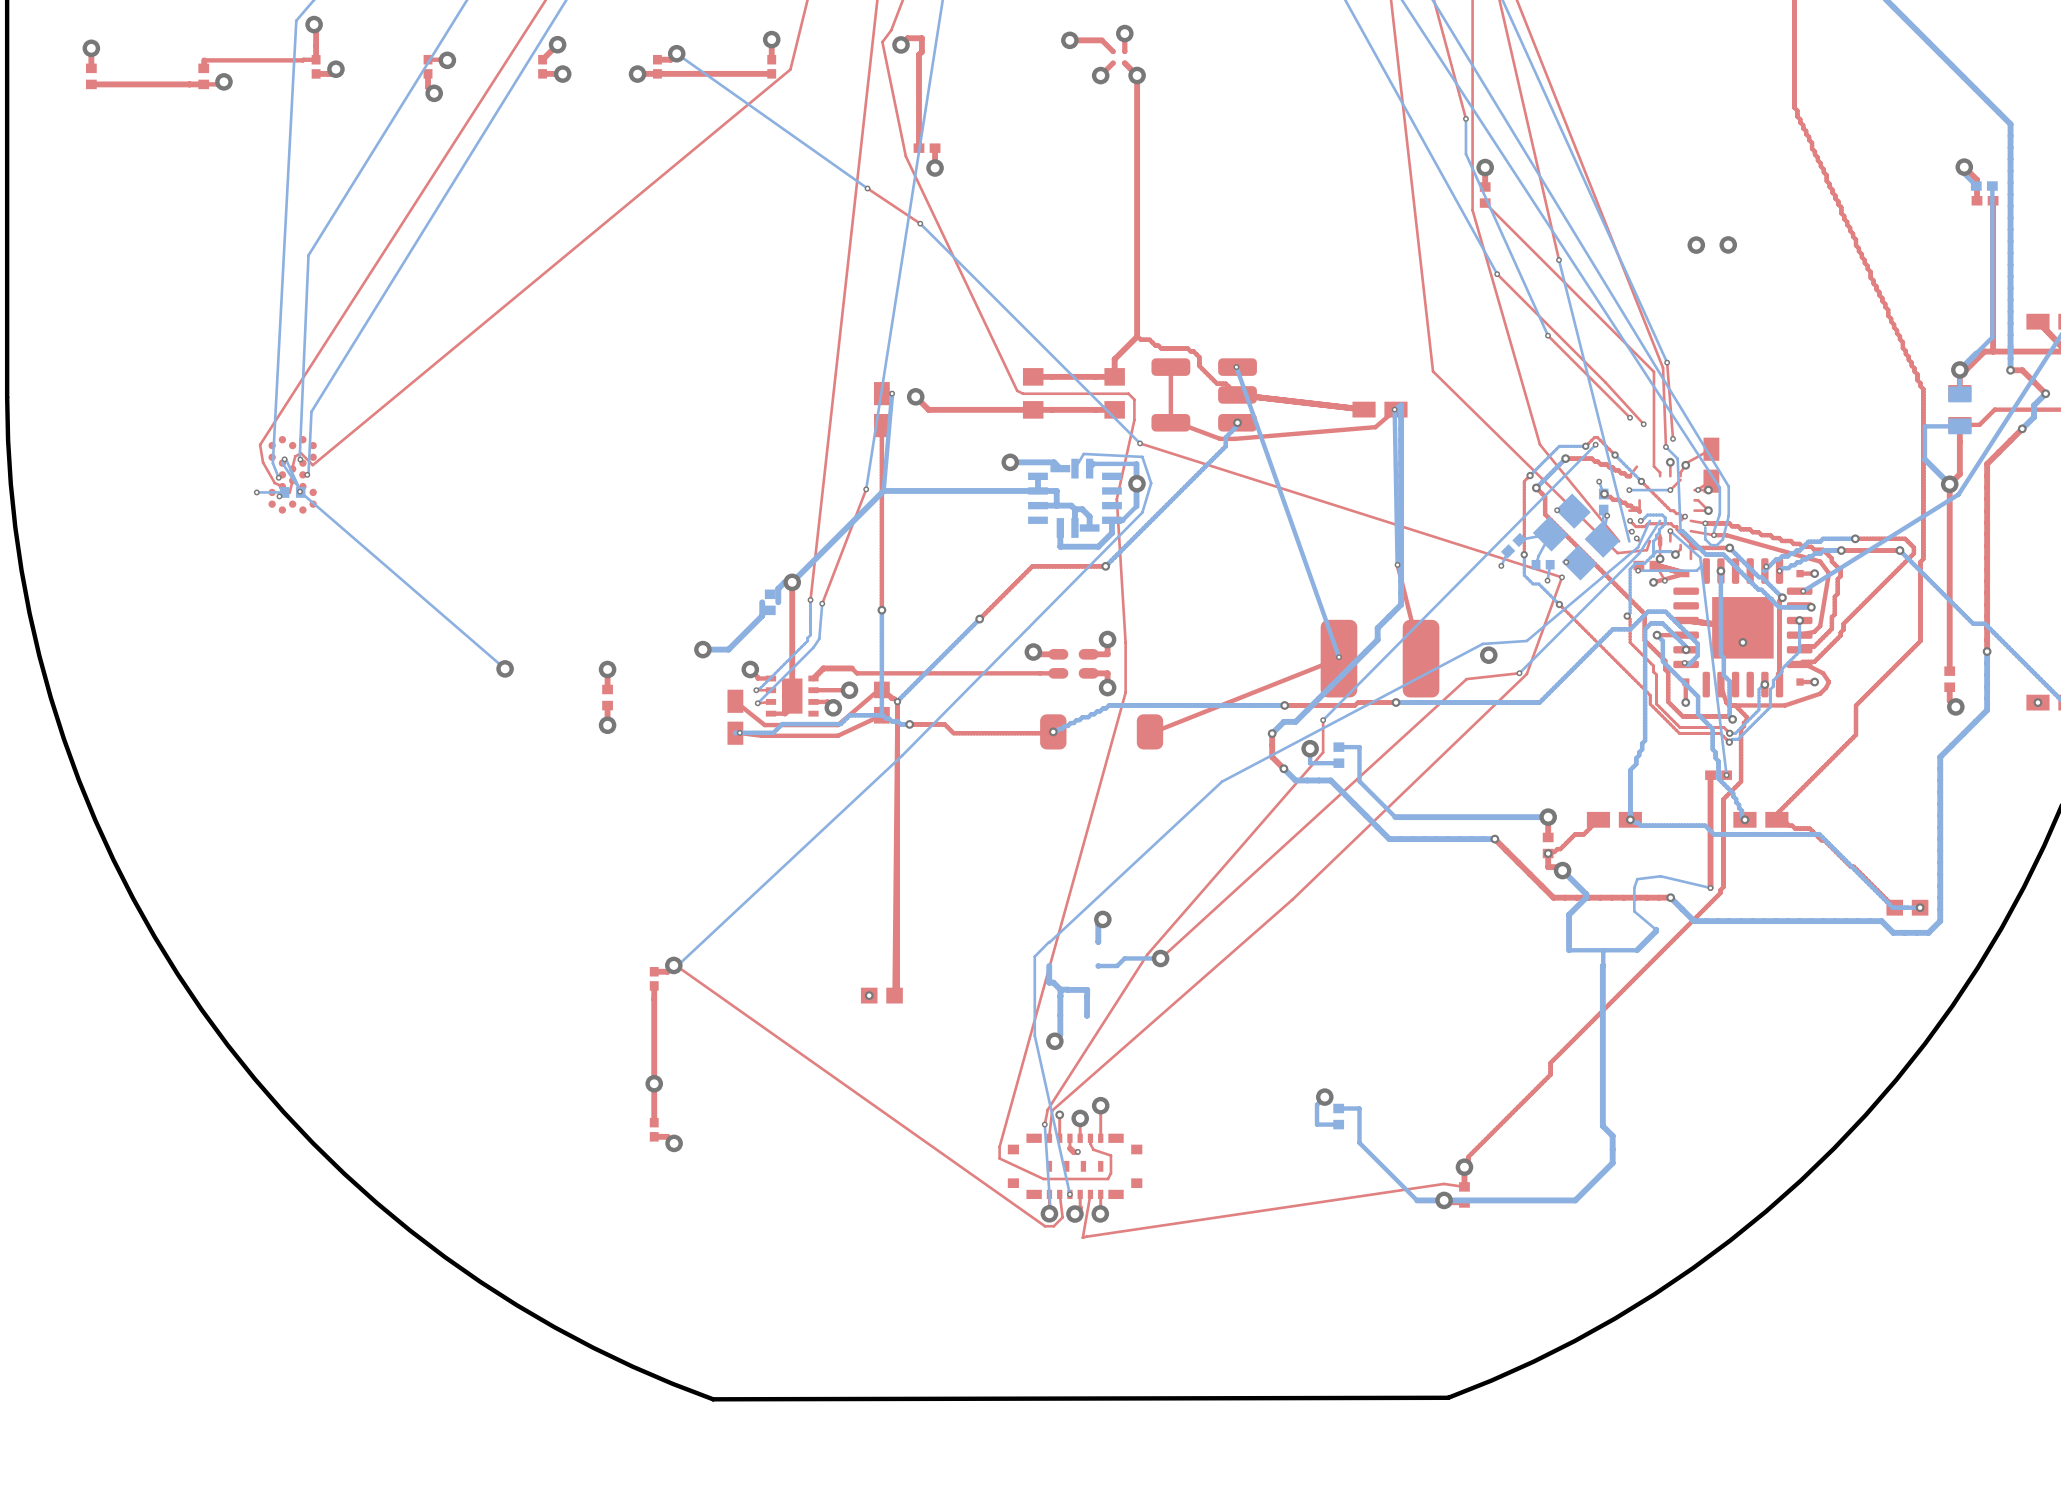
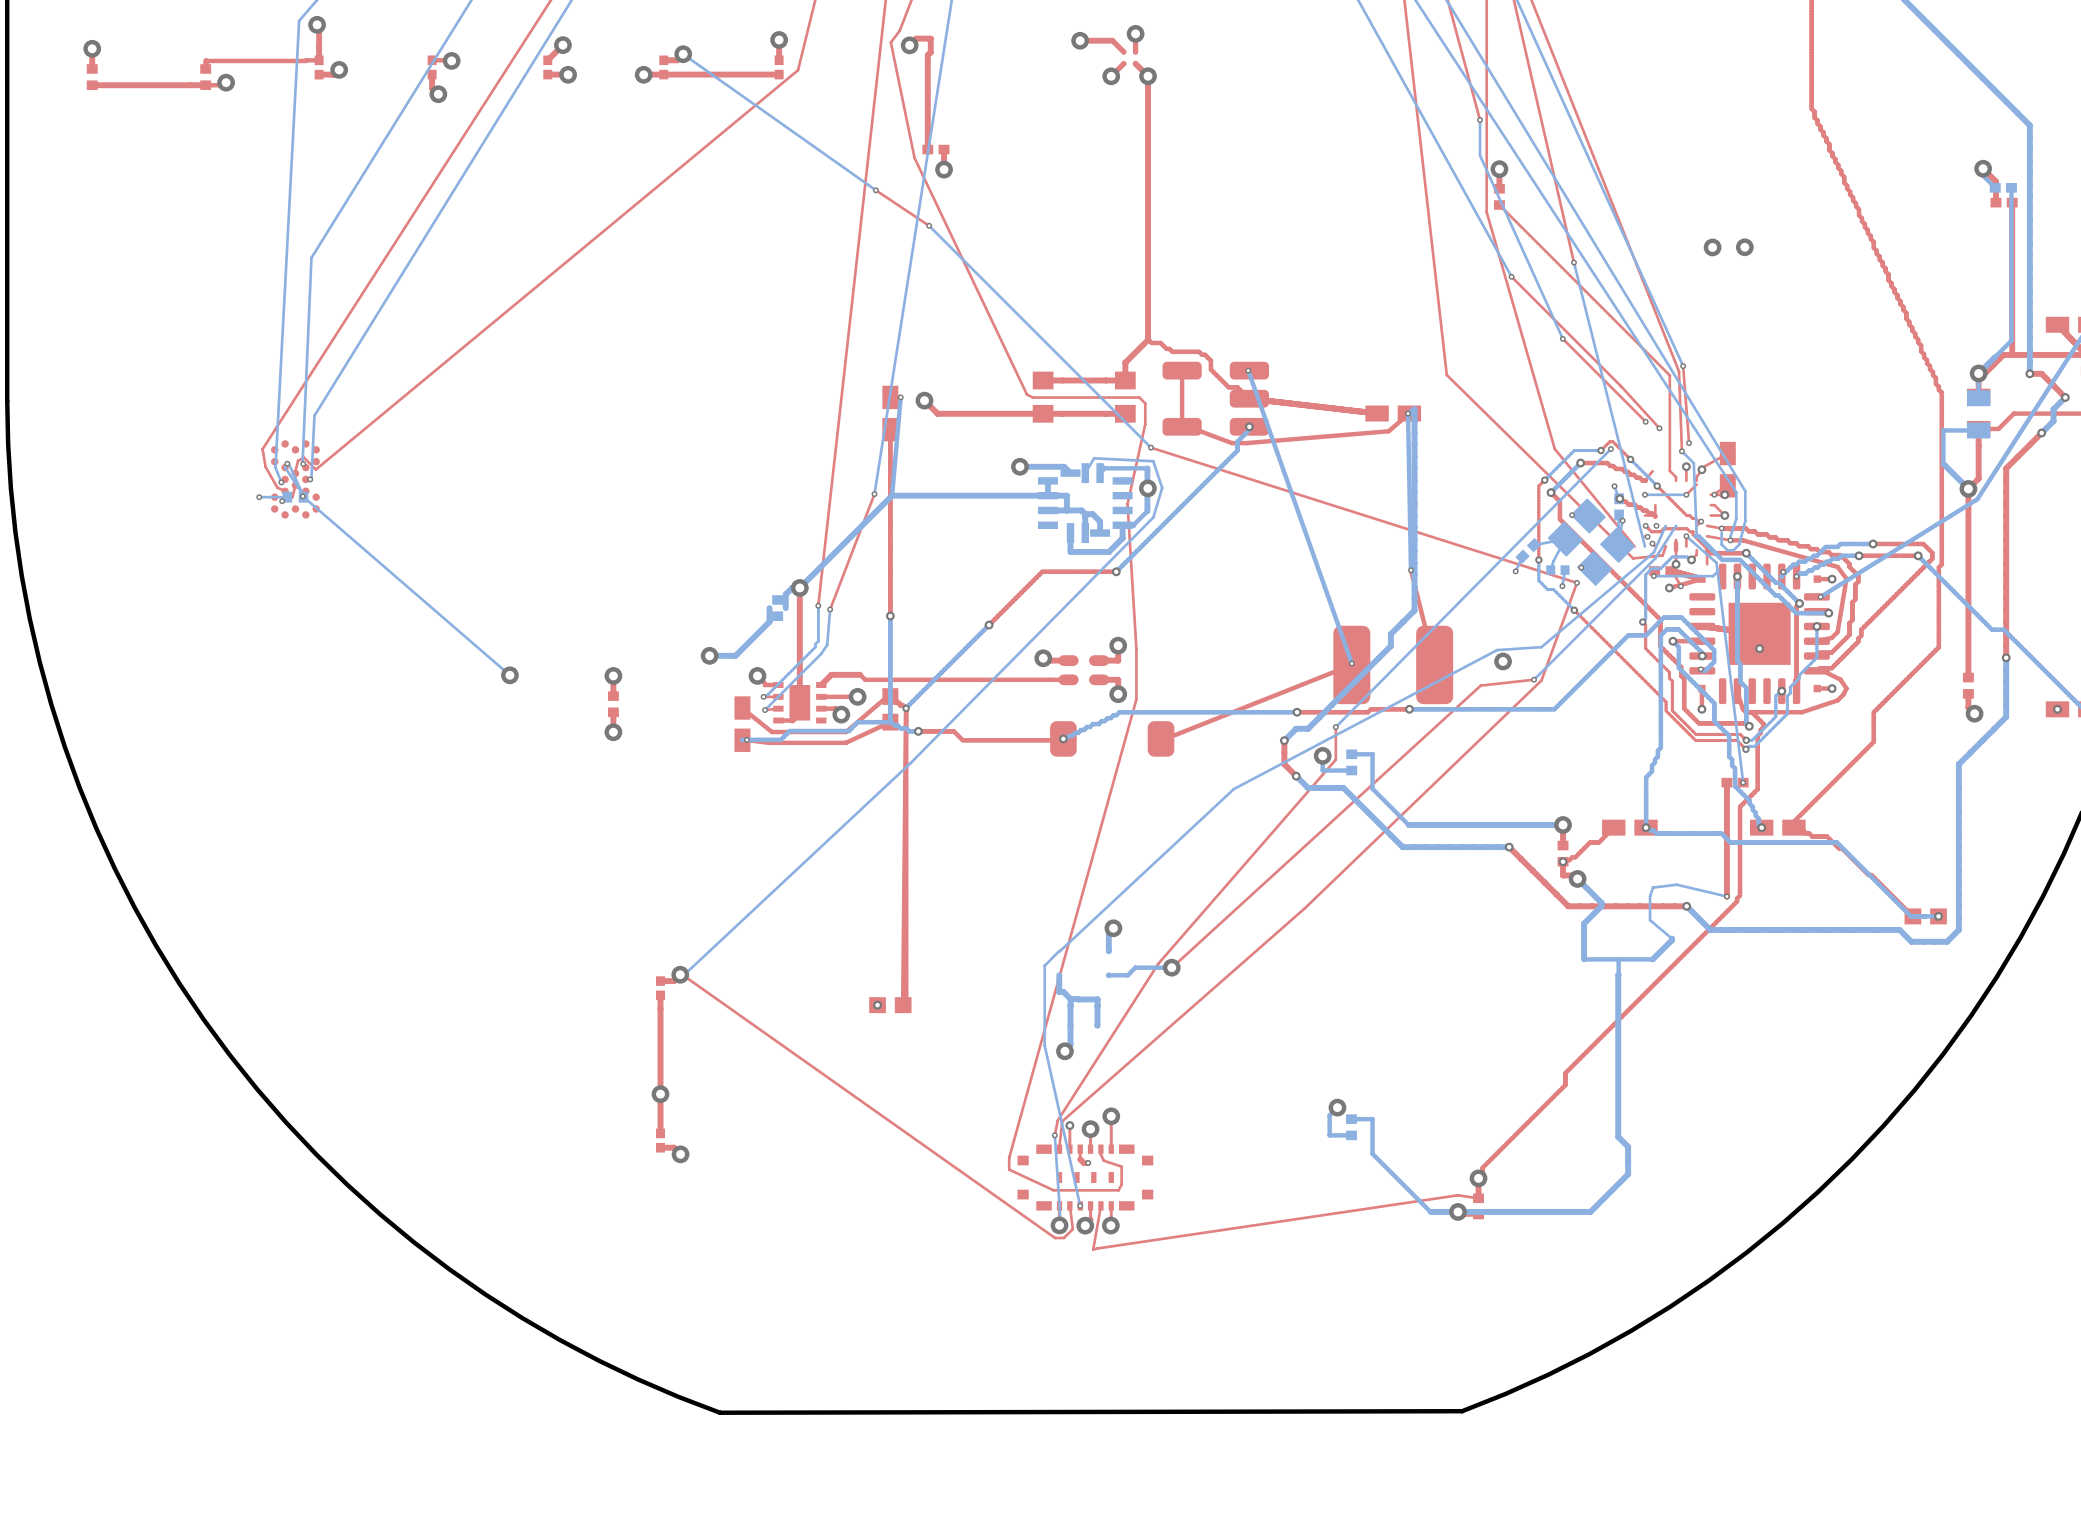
bottom track: (1640, 520) (1647, 515) (1662, 515) (1665, 517) (1665, 523) (1659, 529) (1653, 541) (1653, 556) -> none

